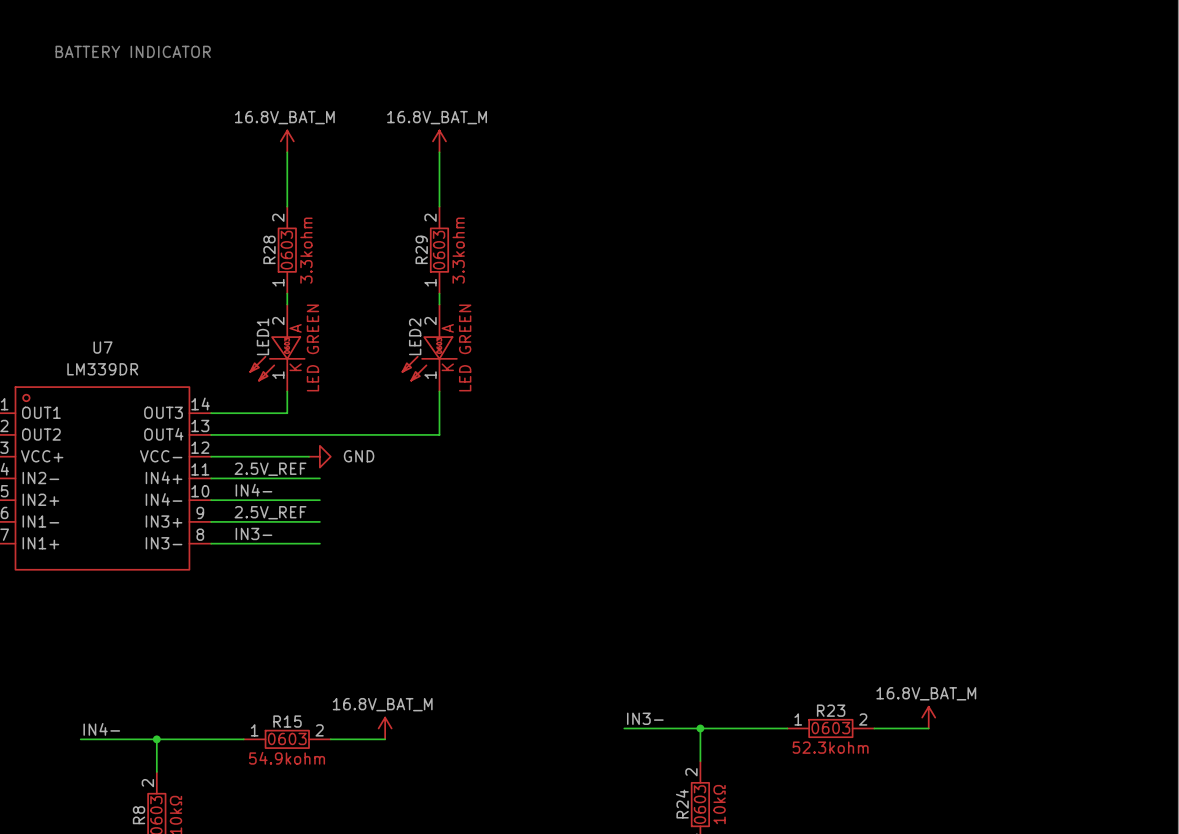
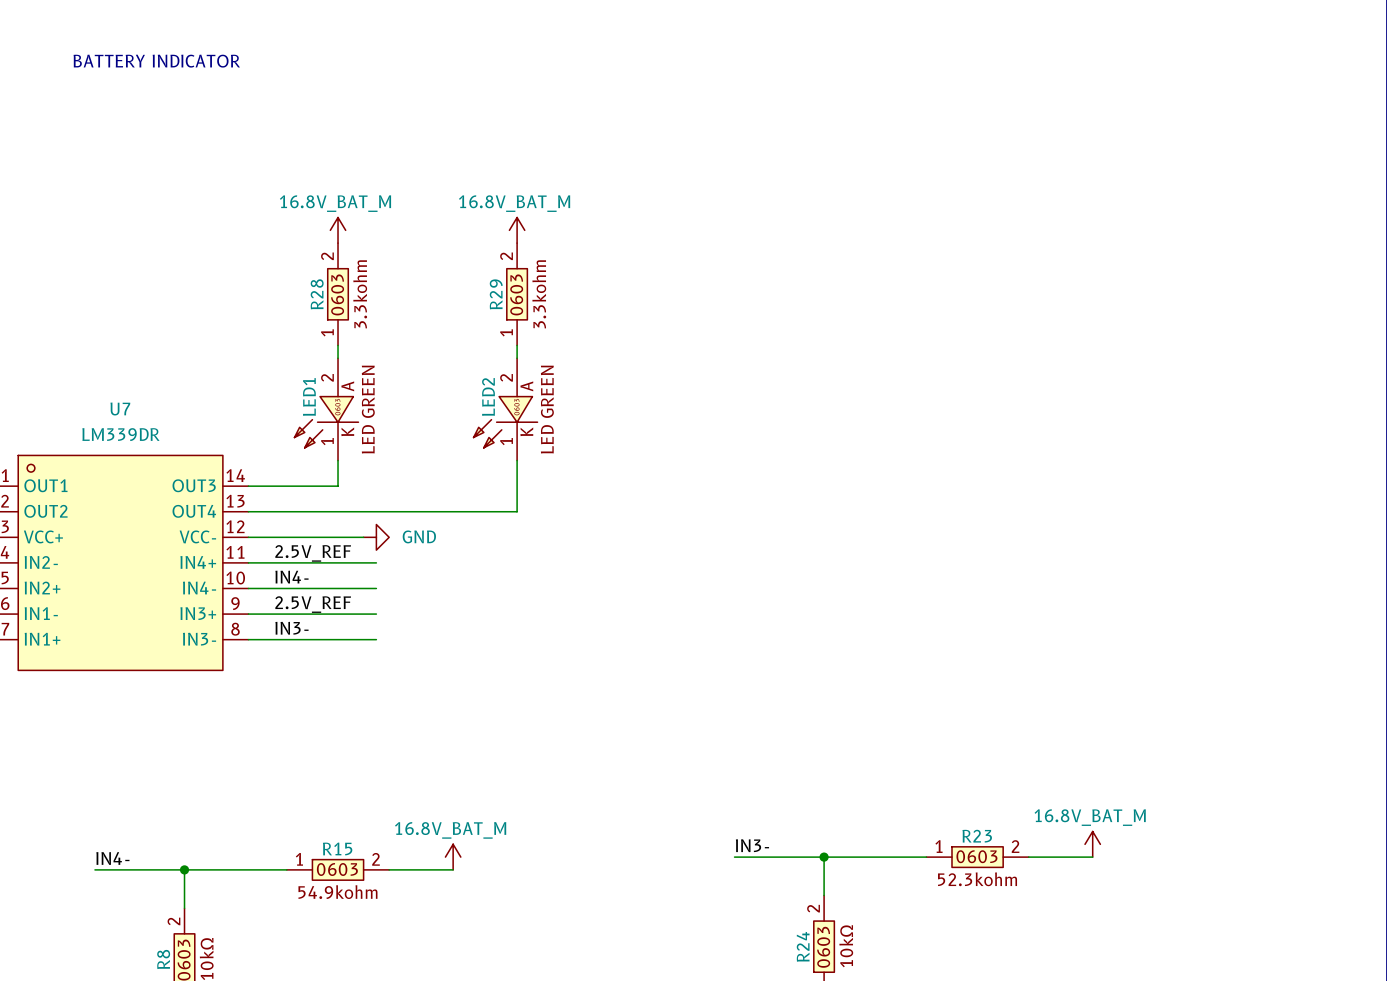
power symbol position: 16.8V_BAT_M (287, 141) -> 16.8V_BAT_M (338, 230)
power symbol position: 16.8V_BAT_M (439, 141) -> 16.8V_BAT_M (517, 230)
wire: (287, 152) (287, 206) -> none
wire: (439, 152) (439, 206) -> none

